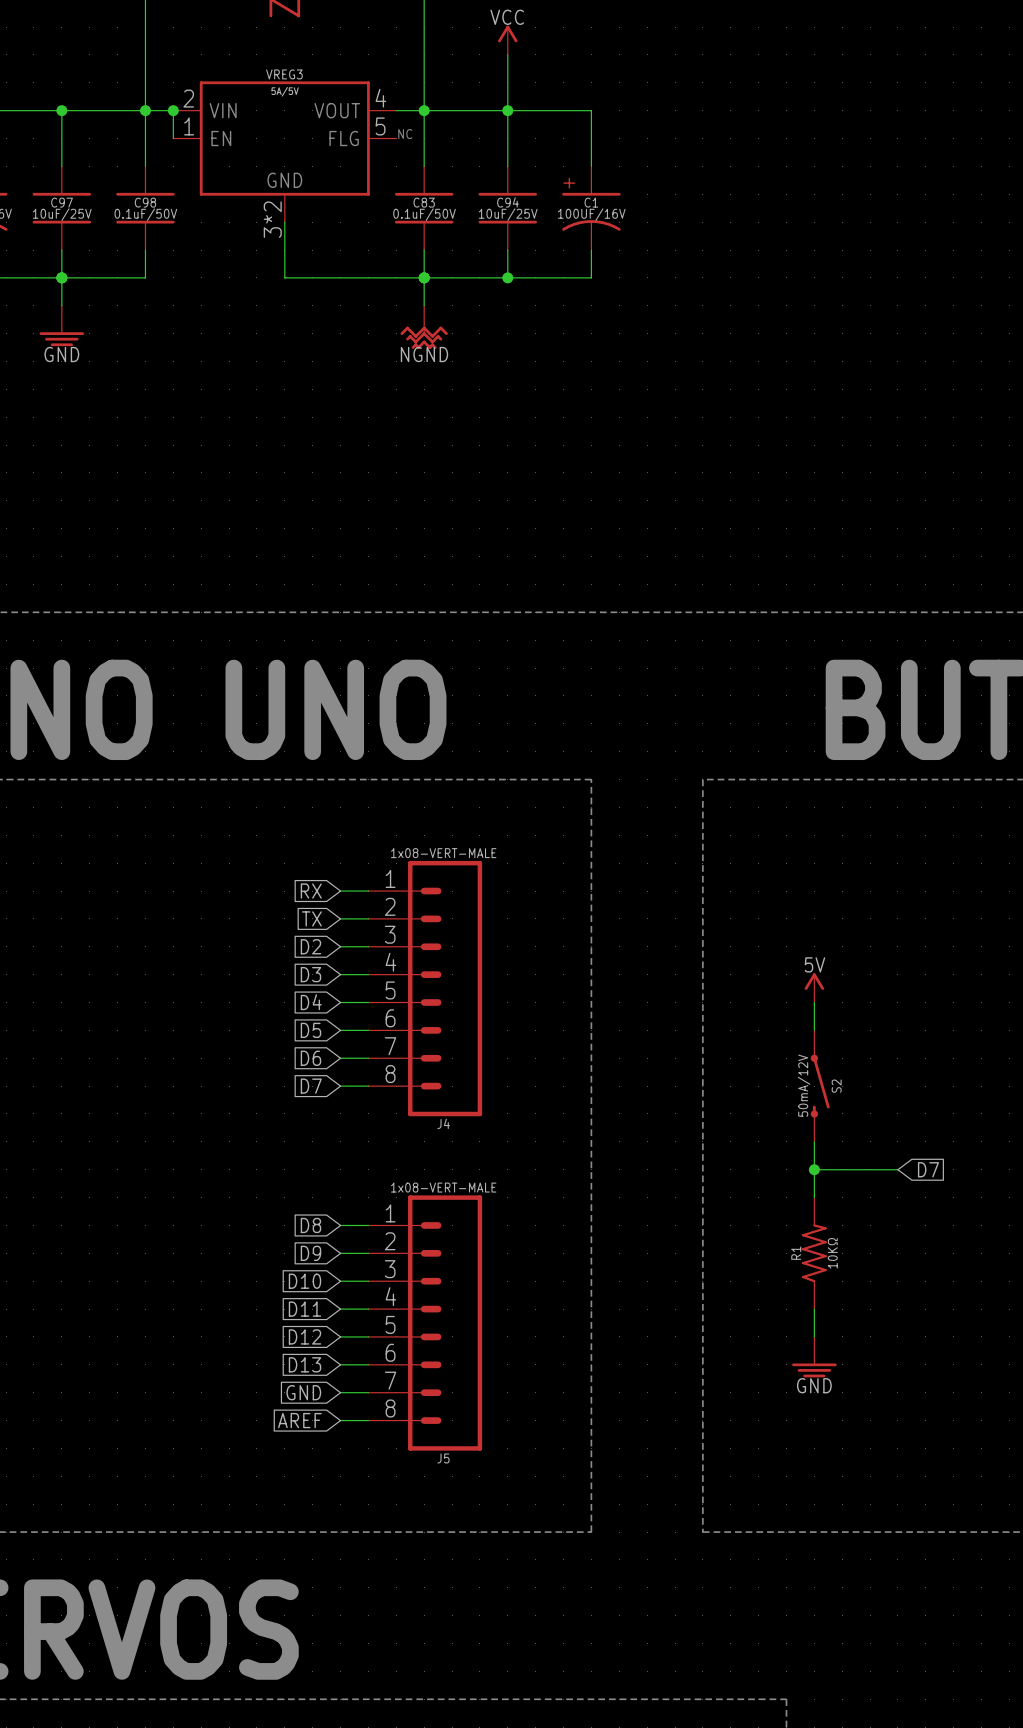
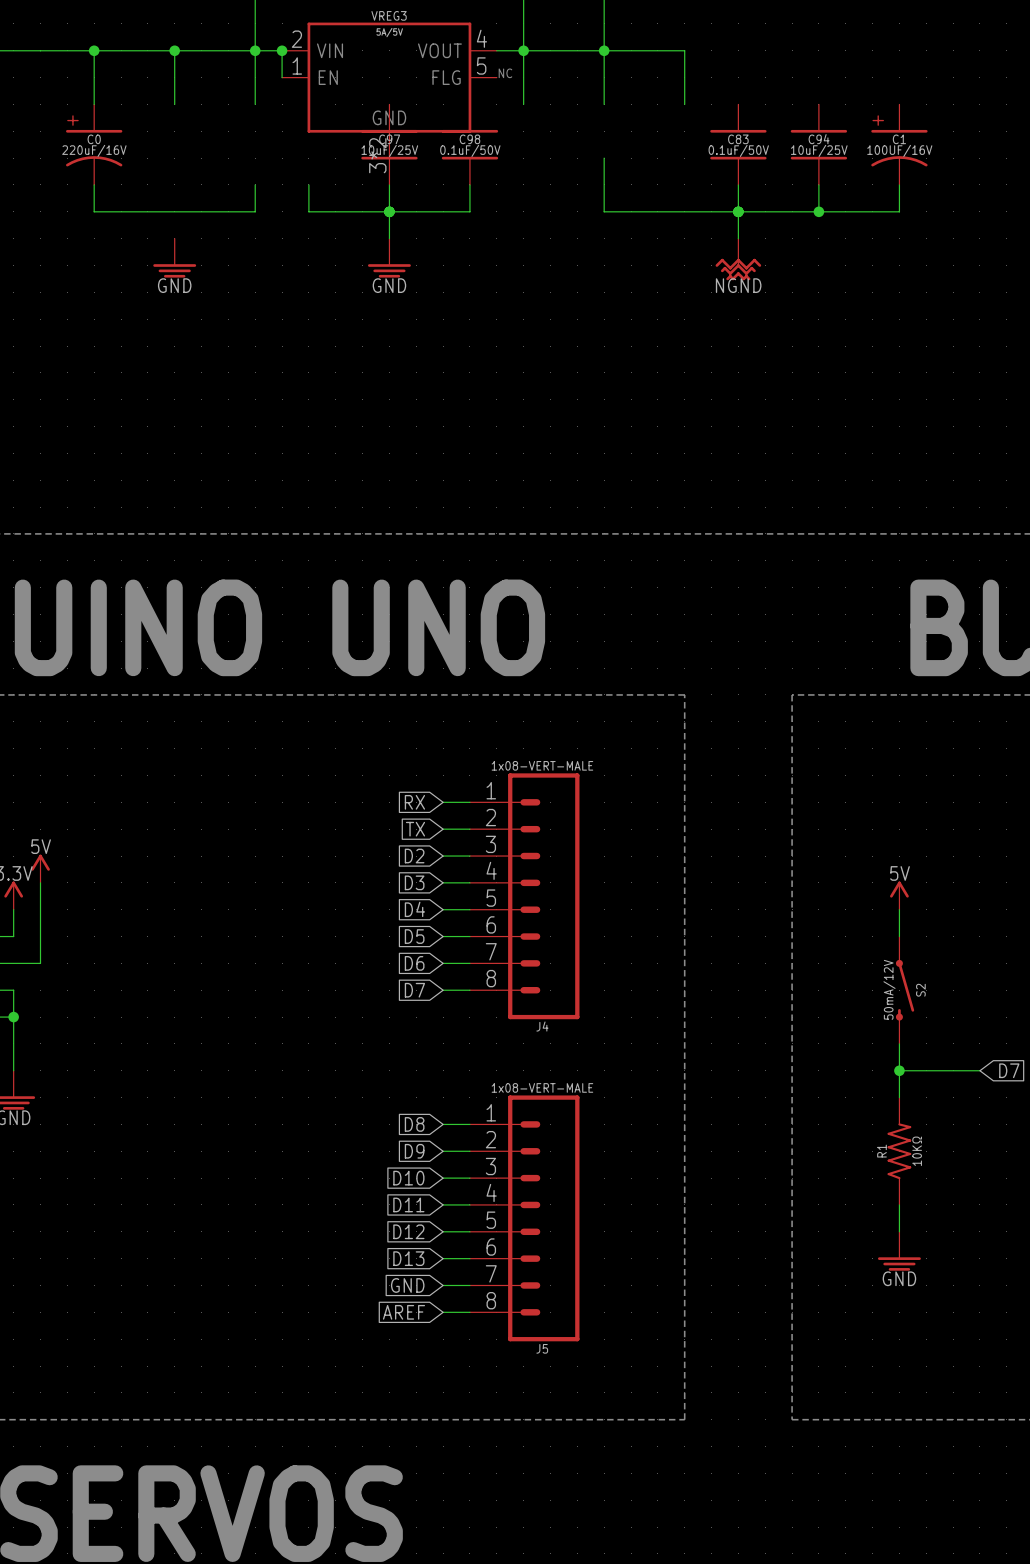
C97 position: (61, 208) -> (389, 144)
C98 position: (145, 208) -> (469, 144)
C83 position: (424, 208) -> (738, 144)
C94 position: (507, 208) -> (818, 144)
C1 position: (591, 208) -> (899, 144)
wire: (61, 250) (61, 305) -> none
wire: none -> (308, 184) (308, 211) (389, 211) (389, 238)
wire: (424, 250) (424, 305) -> (738, 184) (738, 238)
wire: (591, 250) (591, 277) -> (899, 184) (899, 211) (684, 211)
wire: none -> (818, 184) (818, 211)
junction: (61, 277) -> none
junction: none -> (389, 211)
wire: (368, 277) (507, 277) -> (469, 211) (469, 184)
junction: (424, 277) -> none
junction: (507, 277) -> none
junction: none -> (738, 211)
junction: none -> (818, 211)
power symbol: none -> (389, 258)
power symbol position: (424, 327) -> (738, 259)

